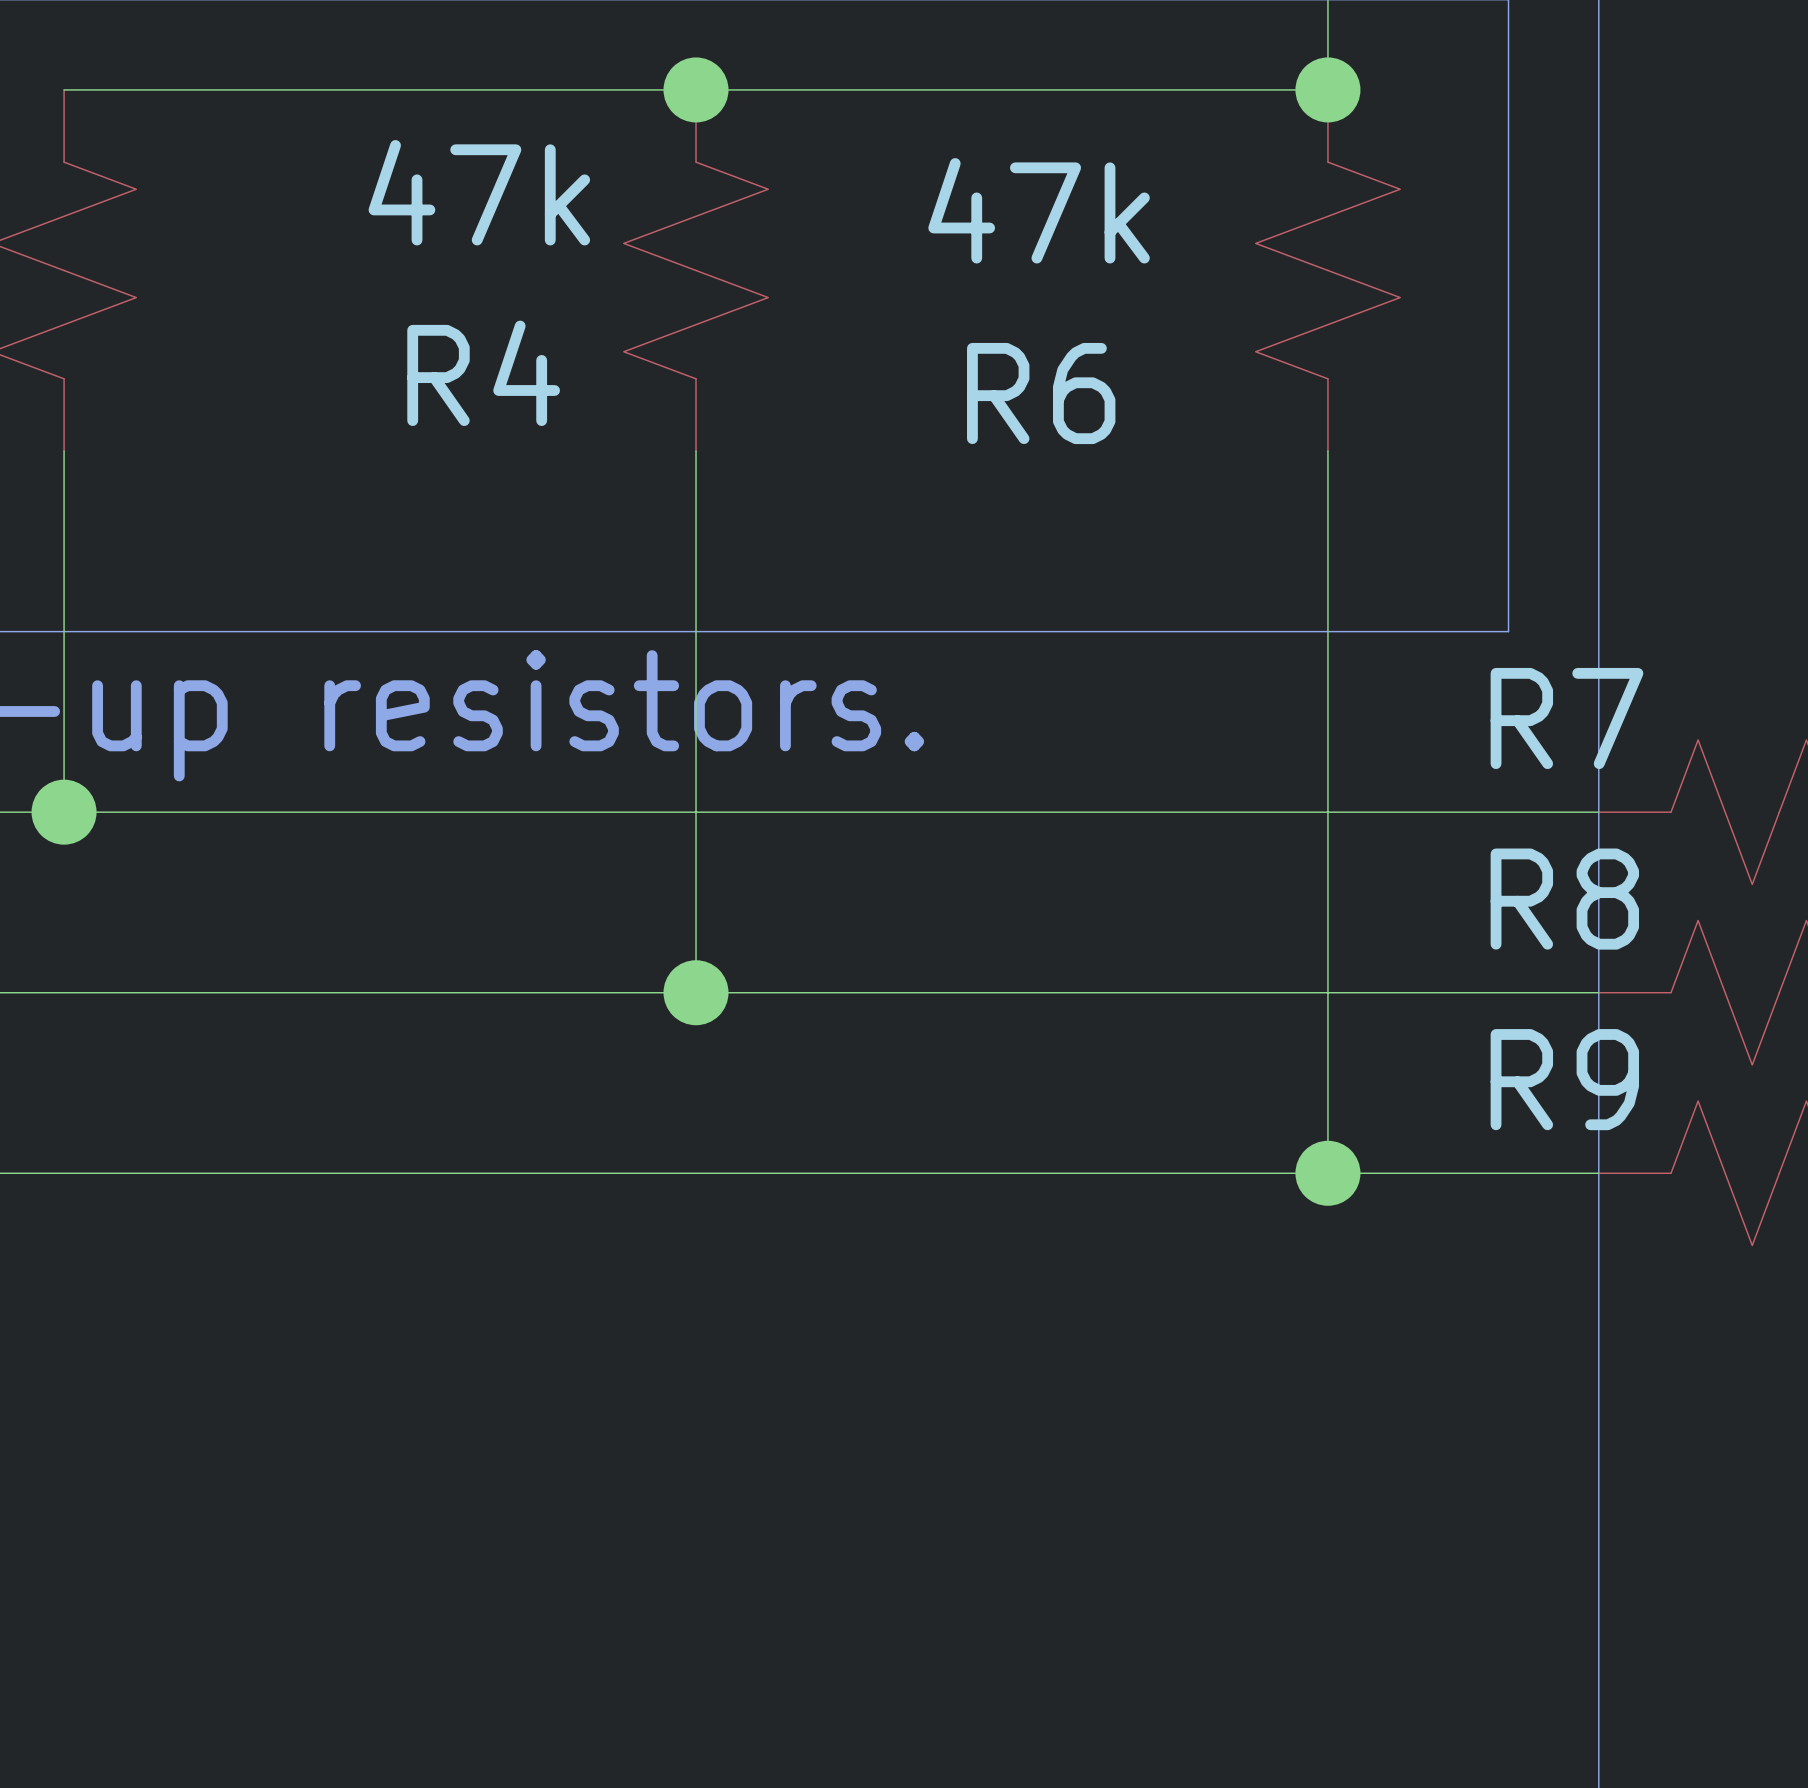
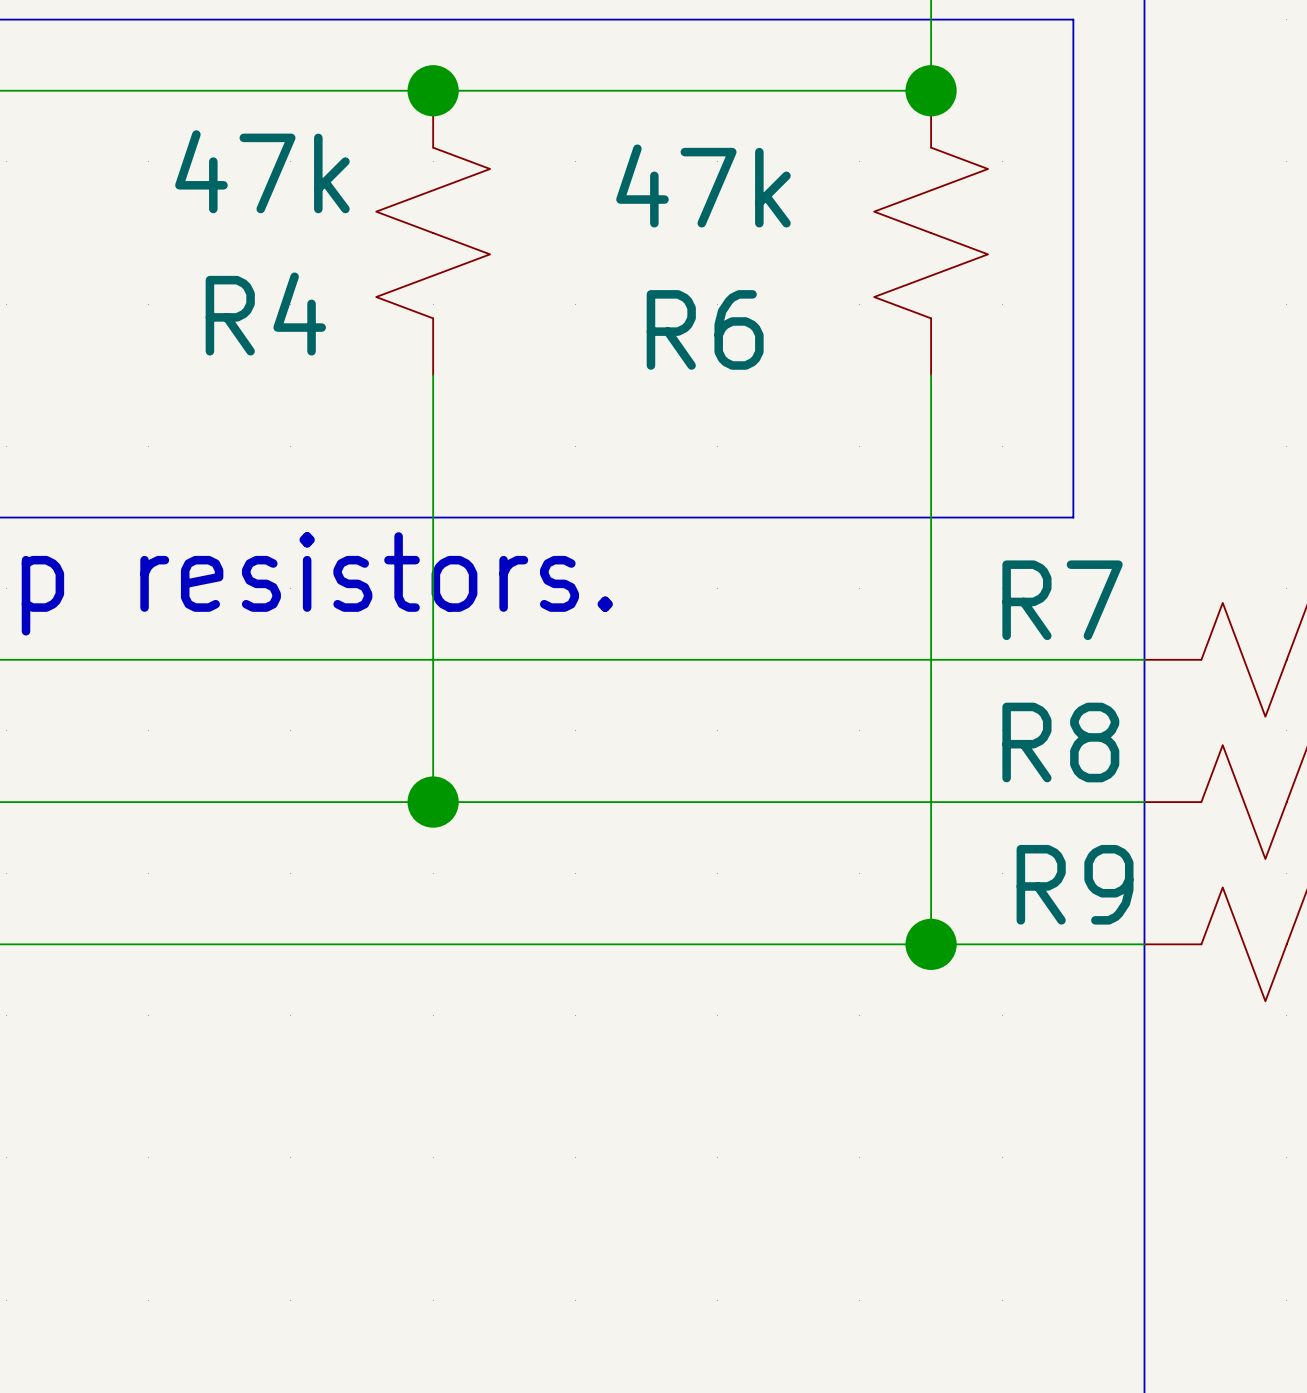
R7 name position: R7 (1566, 718) -> R7 (1062, 600)
R8 name position: R8 (1564, 899) -> R8 (1060, 742)
R9 name position: R9 (1564, 1079) -> R9 (1075, 884)

